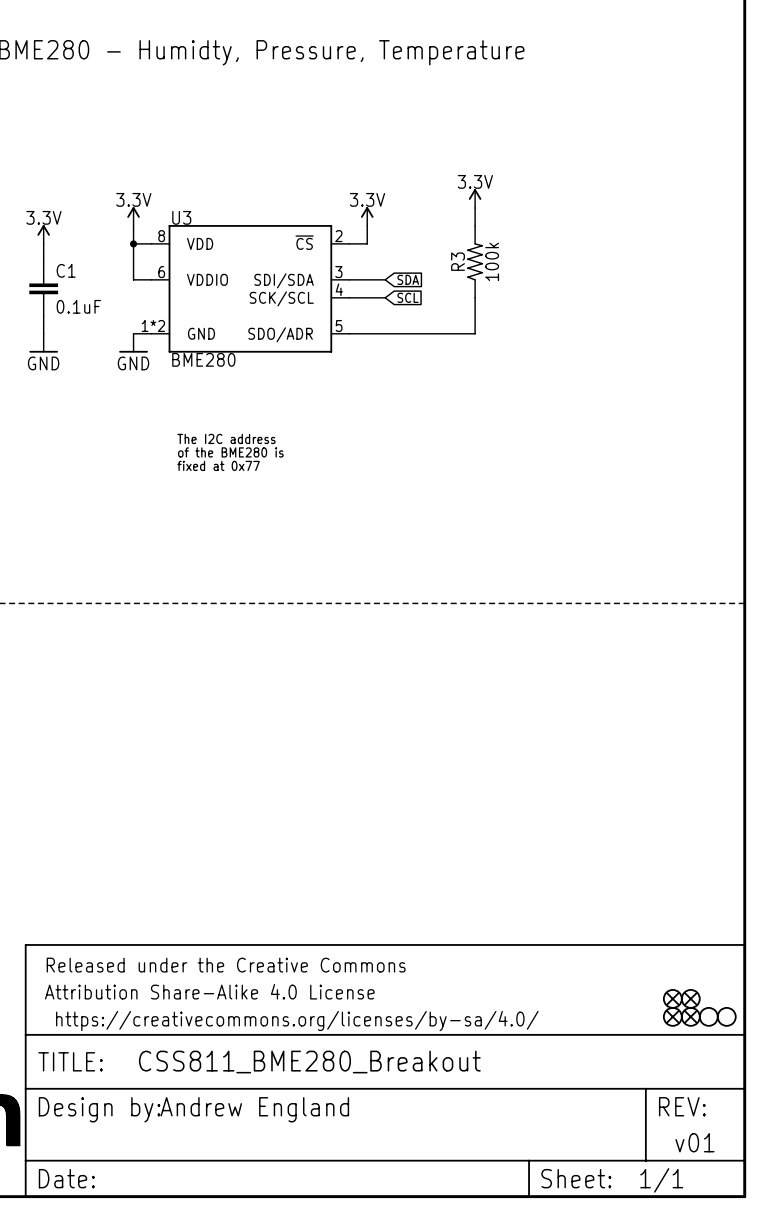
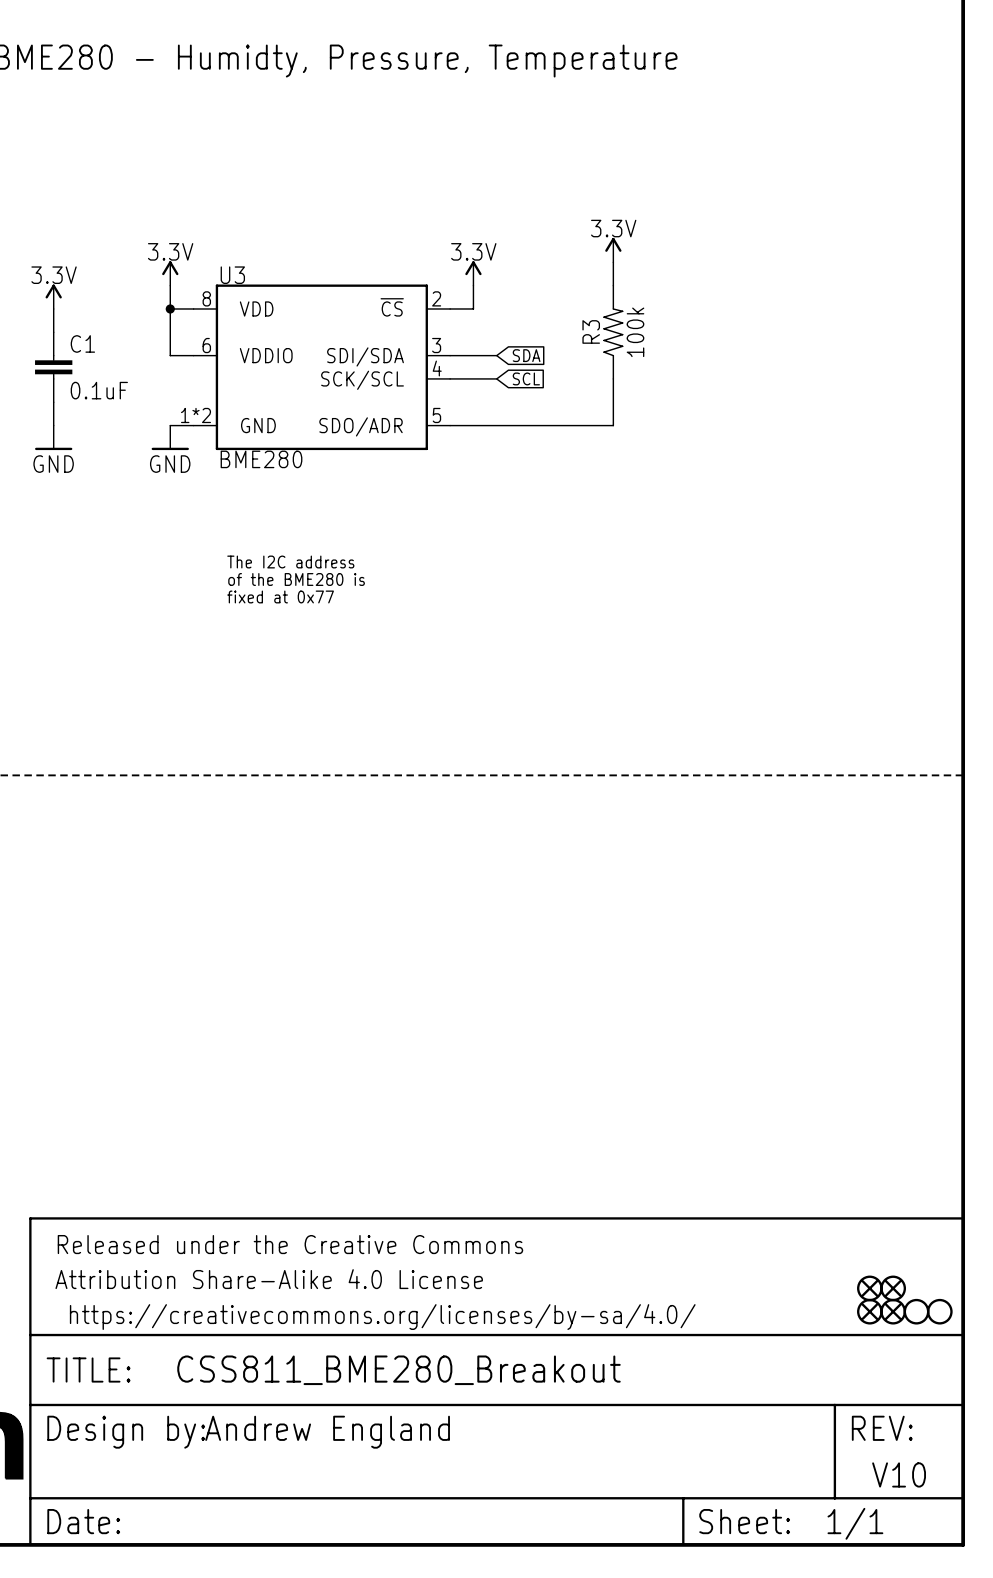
text: v01 (694, 1142) -> V10 (899, 1474)

